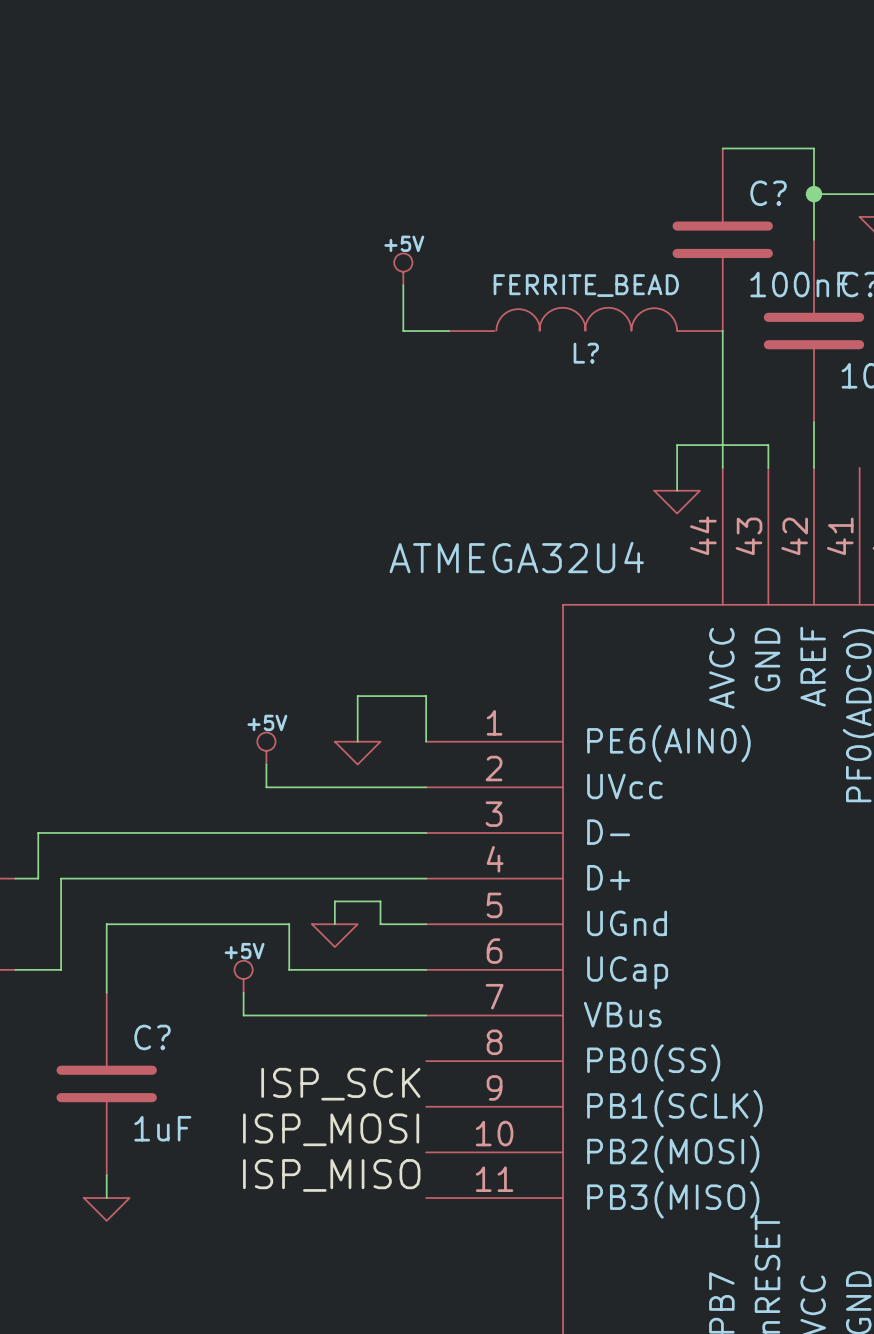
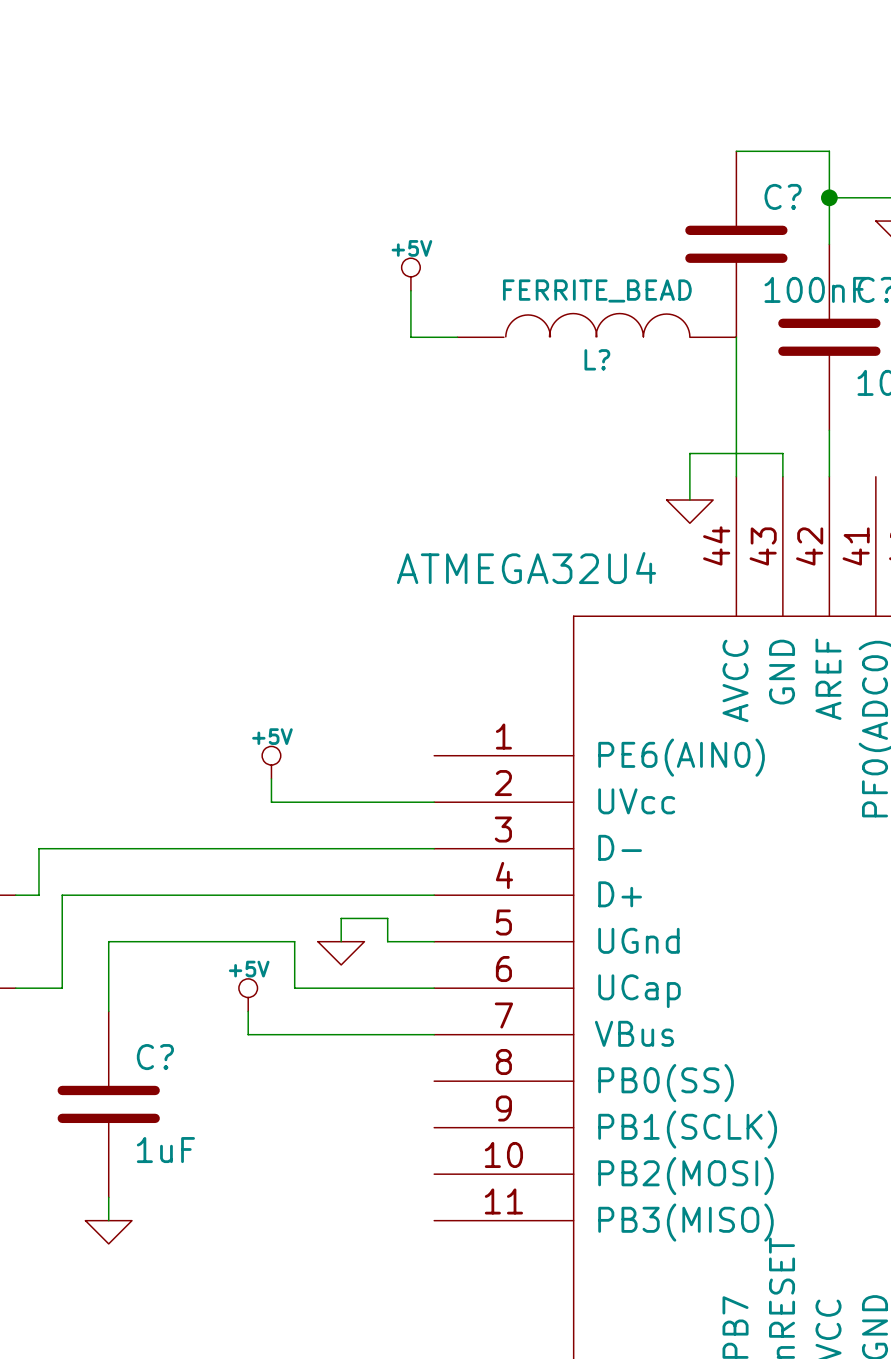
wire: (357, 741) (357, 696) (426, 696) (426, 741) -> none
power symbol: (357, 753) -> none
label: ISP_SCK (340, 1084) -> none
label: ISP_MOSI (331, 1129) -> none
label: ISP_MISO (331, 1175) -> none

